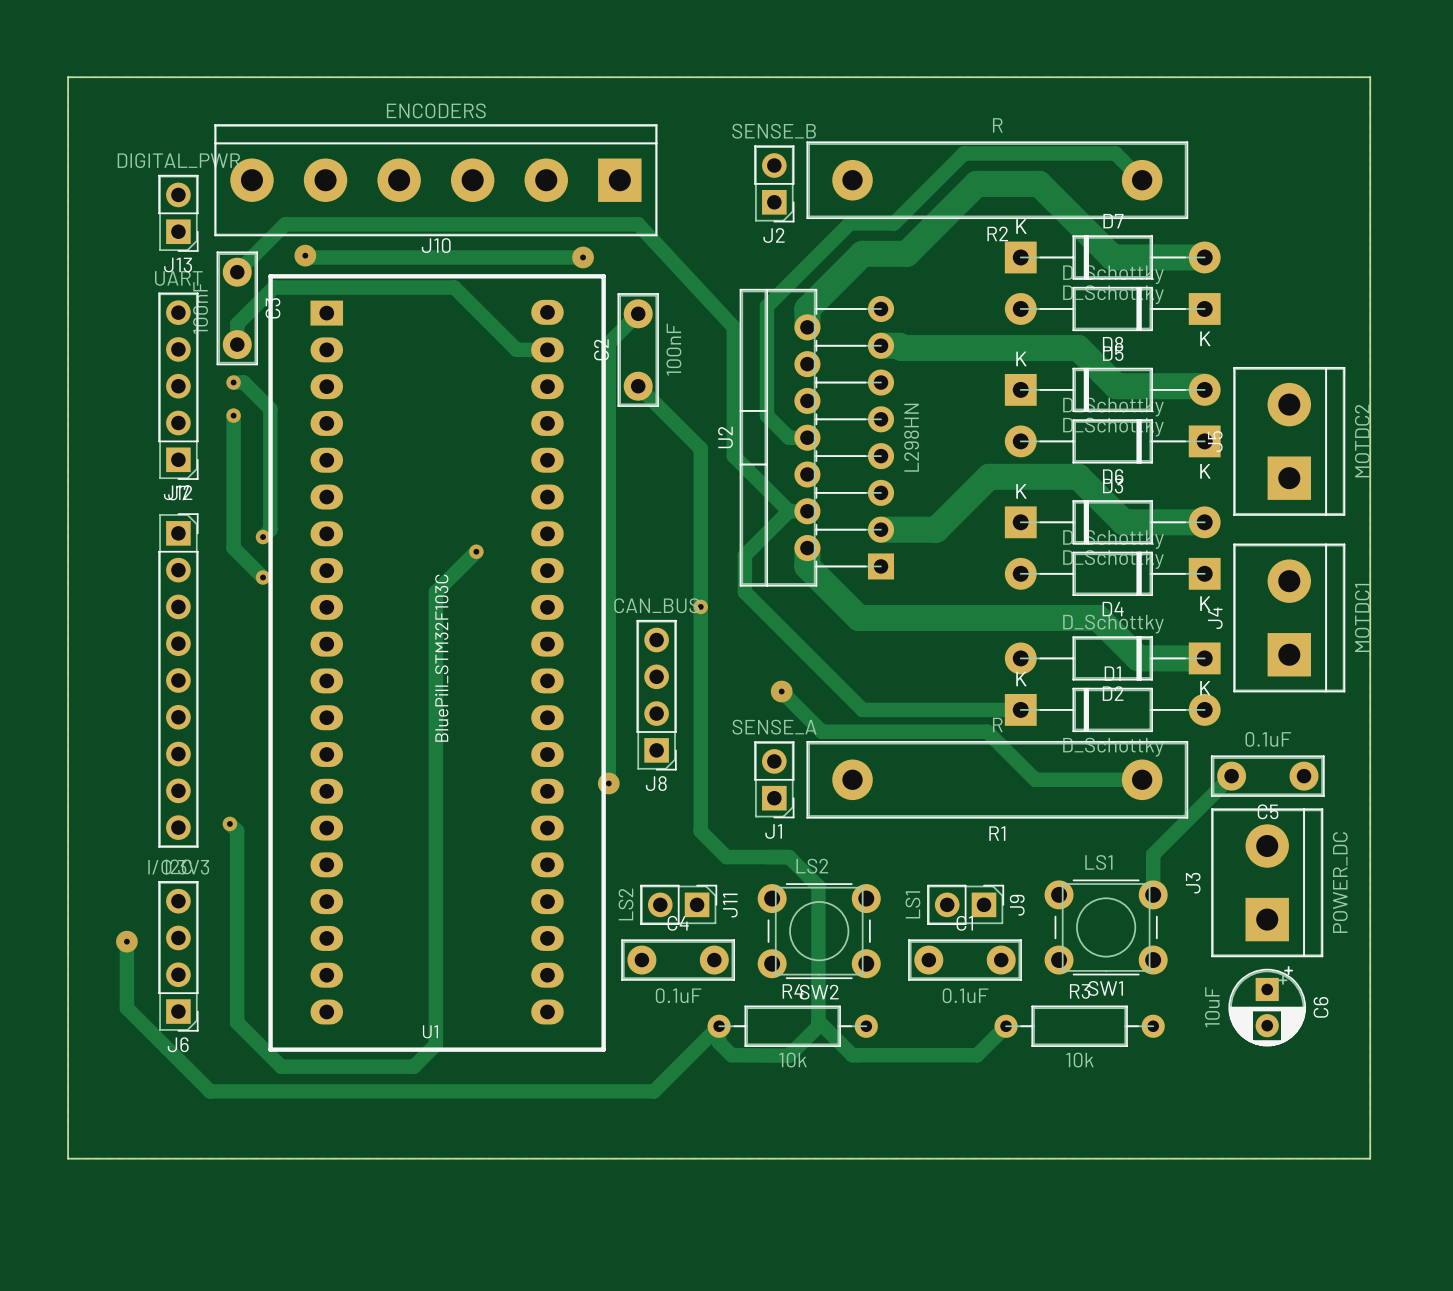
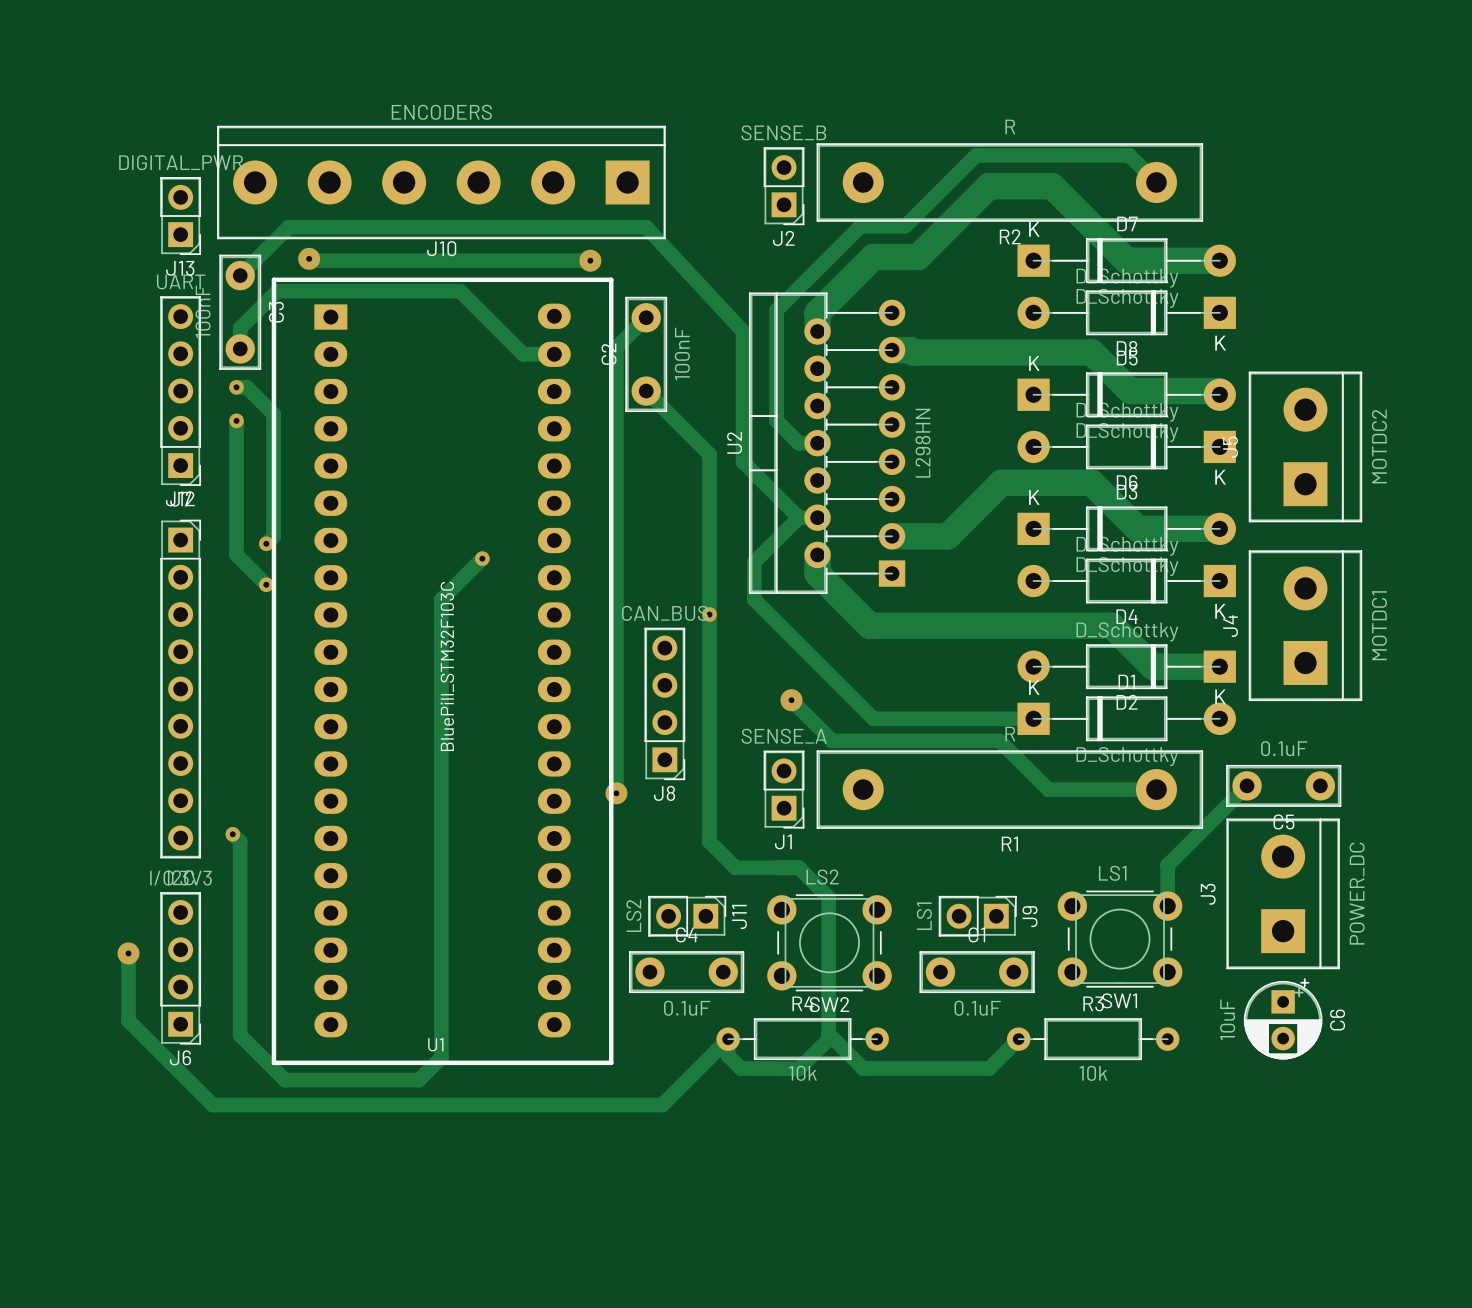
board edge: (68, 77) (1370, 77) (1370, 1158) (68, 1158) (68, 77) -> none

